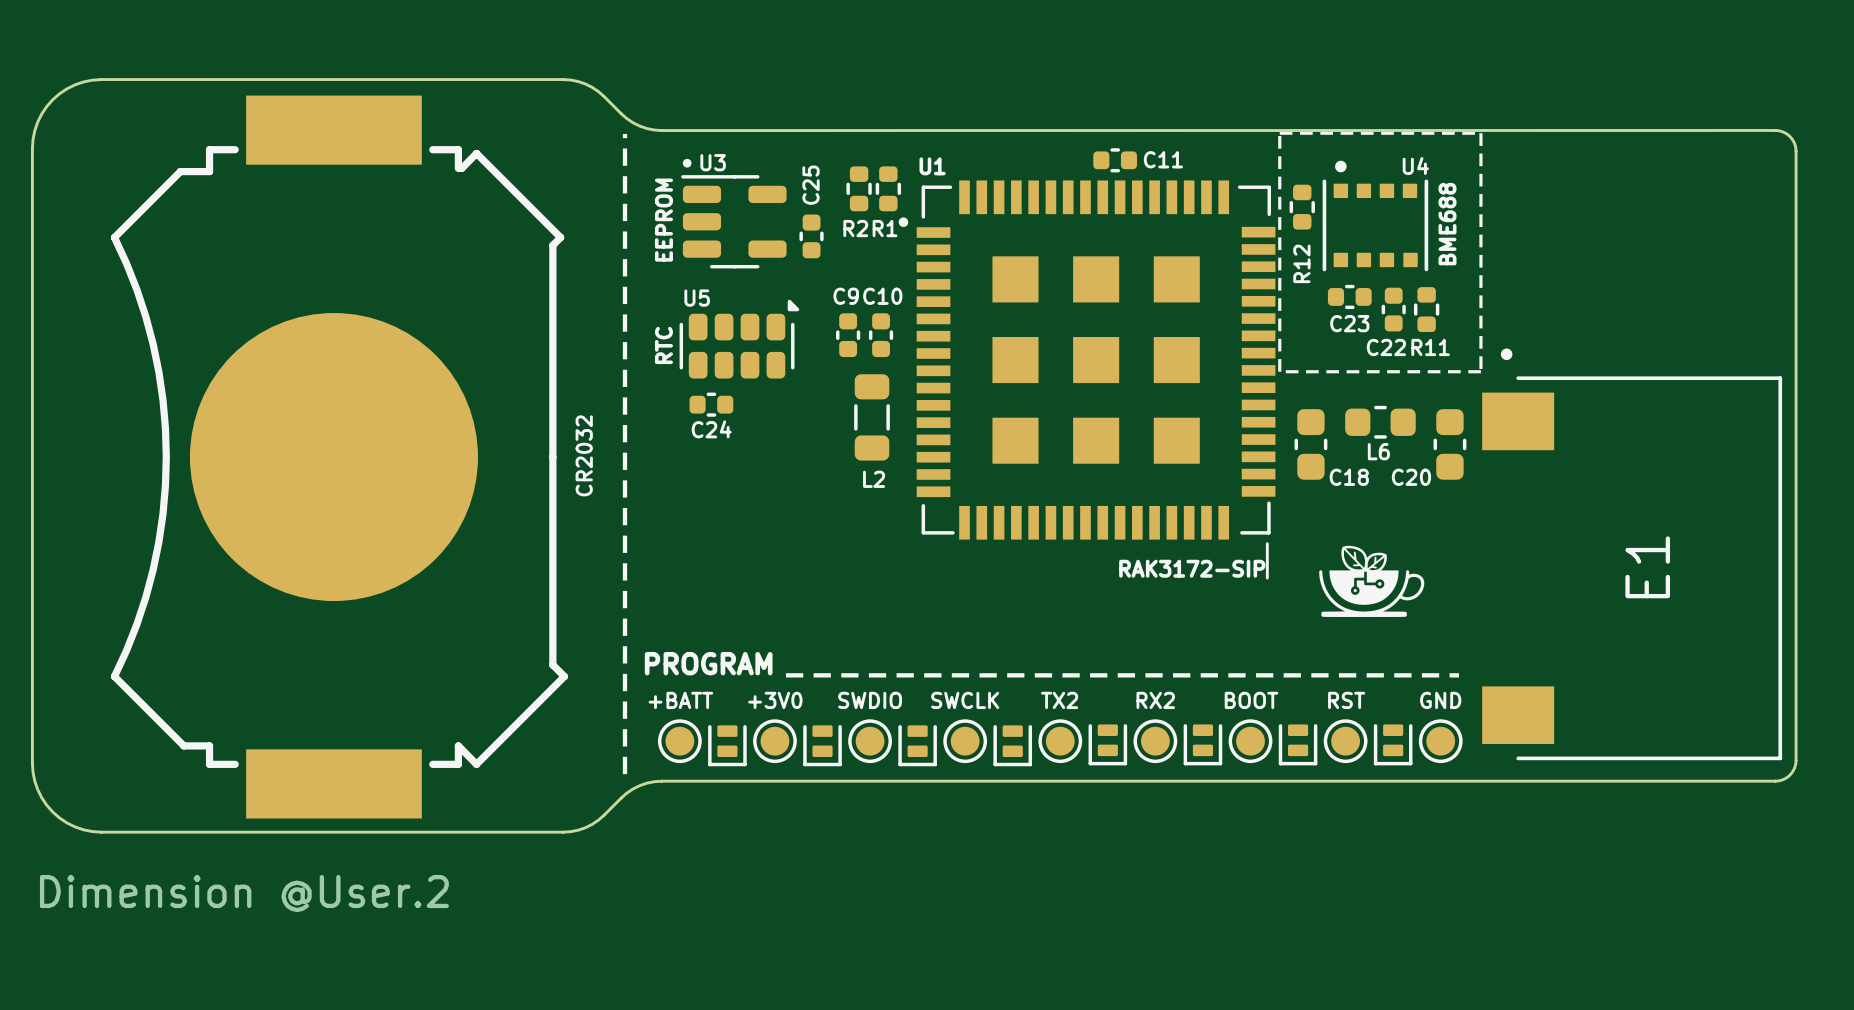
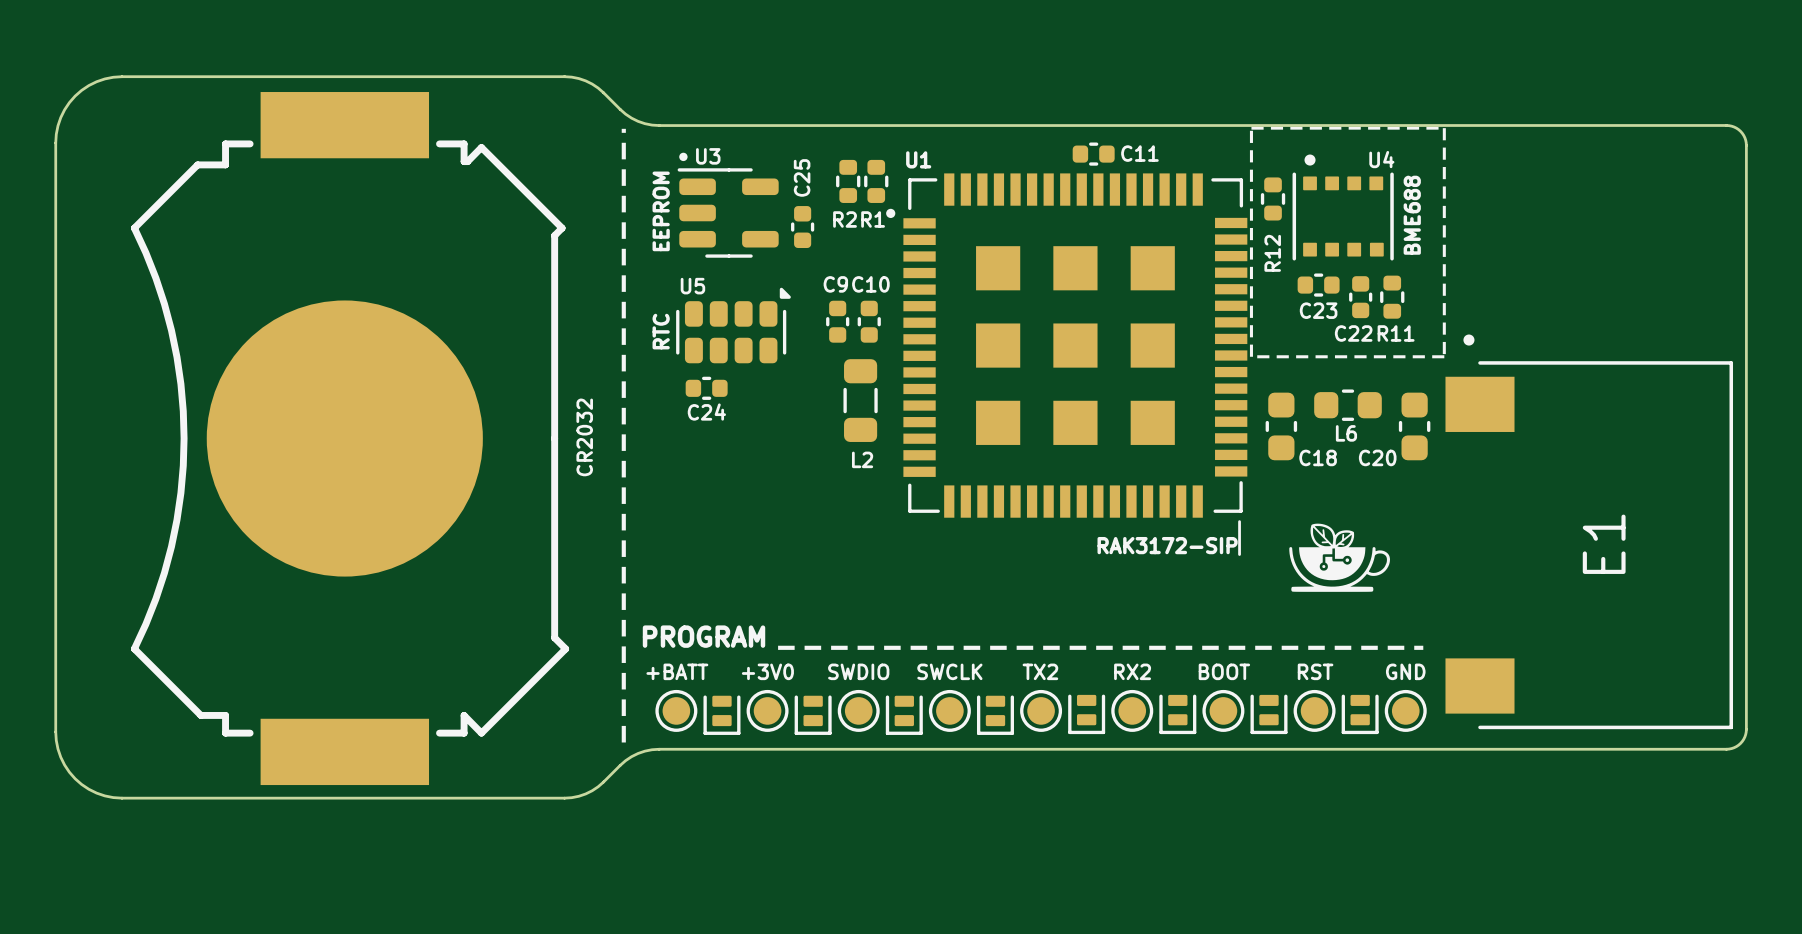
text: Dimension @User.2 (244, 893) -> none

